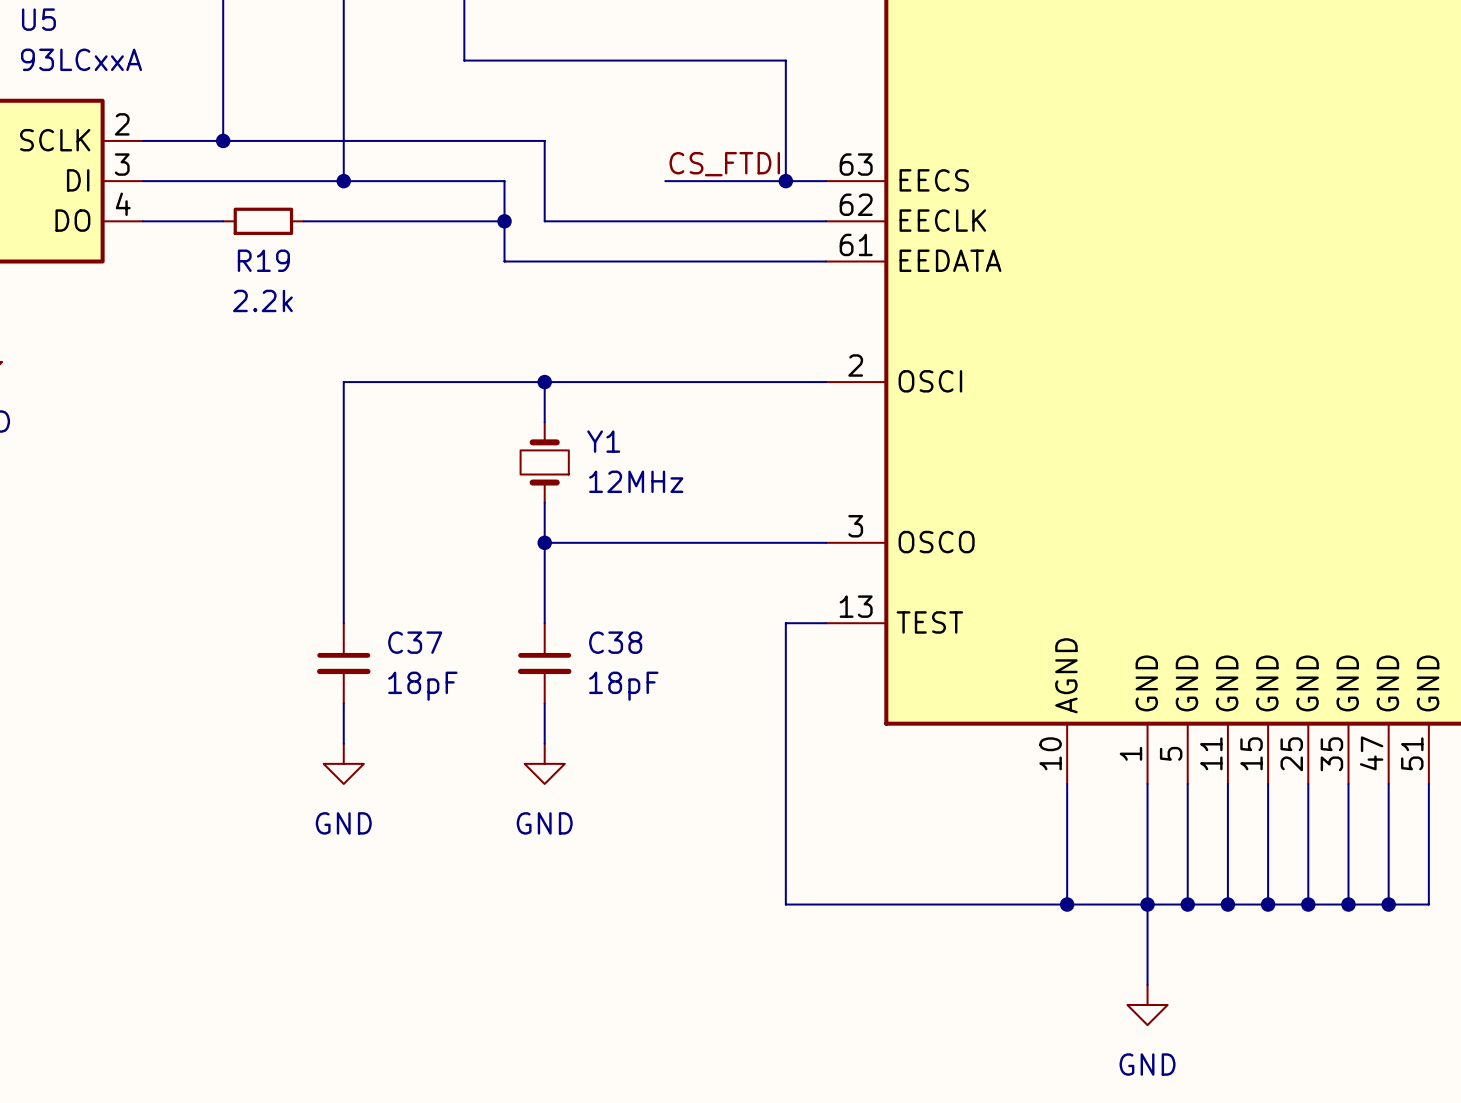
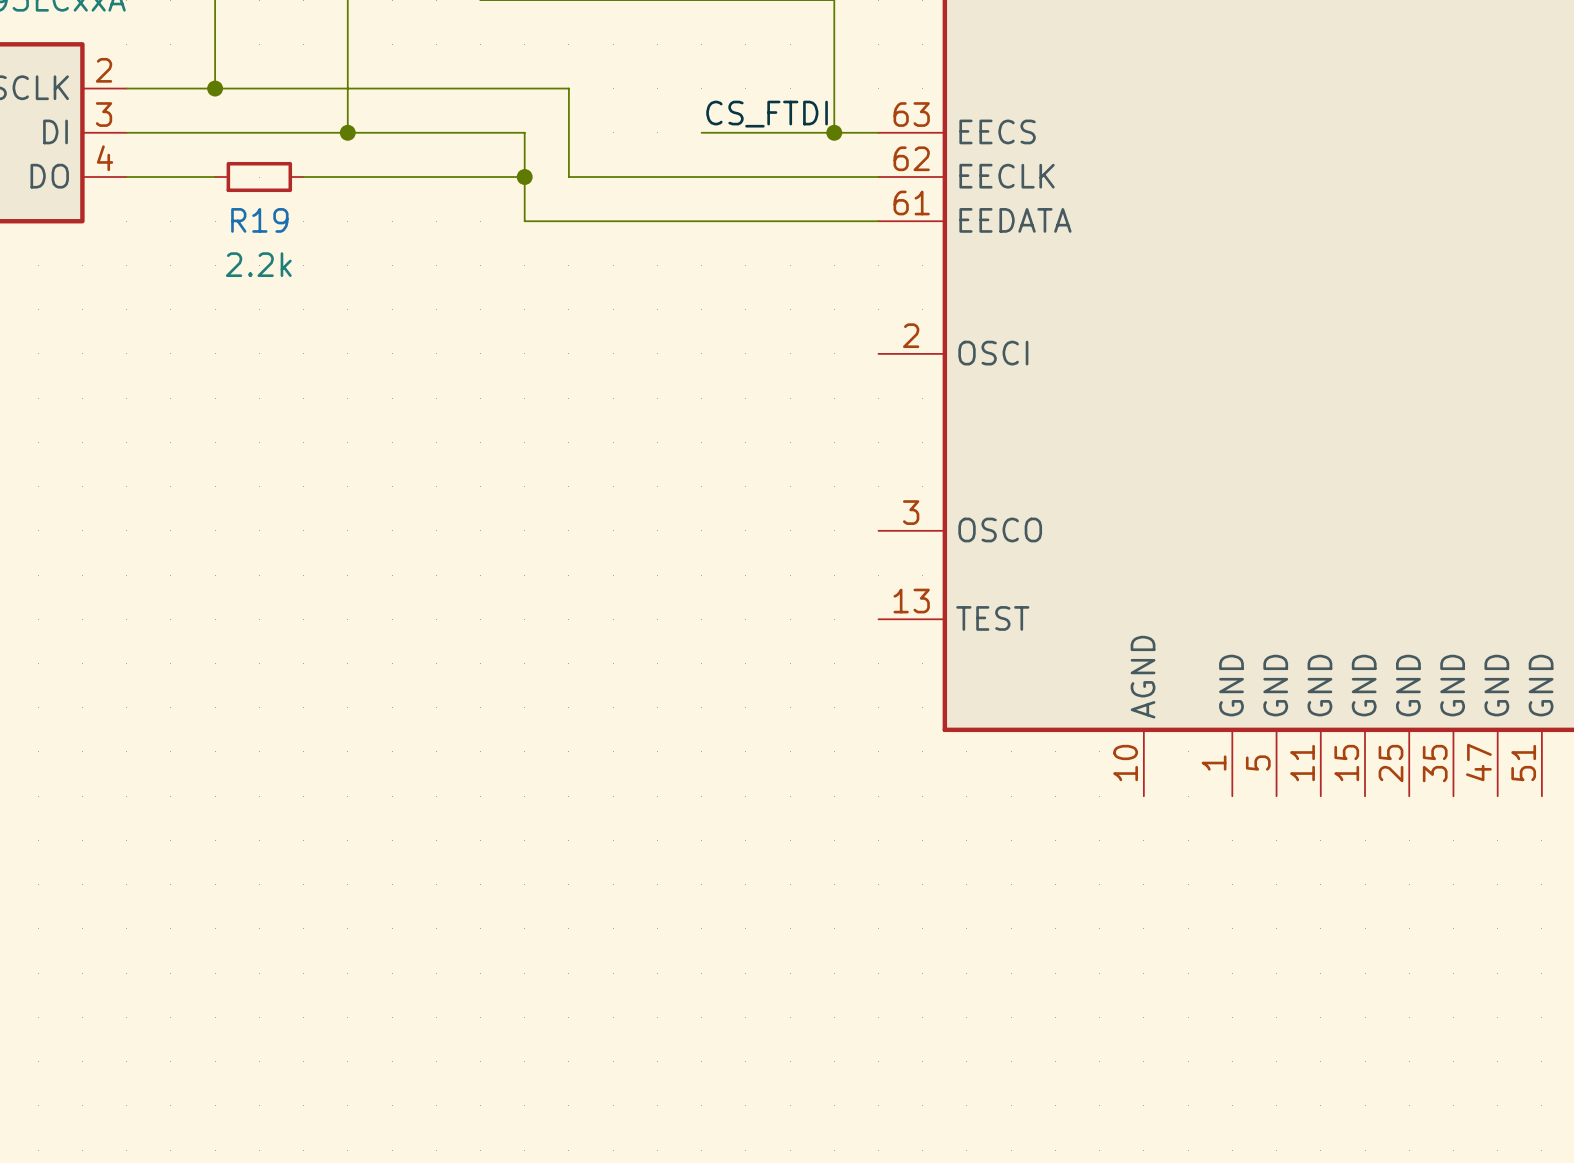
wire: (544, 382) (544, 422) -> none
junction: (544, 382) -> none
wire: (826, 382) (343, 382) (343, 623) -> none
Y1: 12MHz (544, 462) -> none
wire: (544, 502) (544, 623) -> none
wire: (544, 542) (826, 542) -> none
junction: (544, 542) -> none
wire: (826, 623) (785, 623) (785, 904) (1428, 904) (1428, 783) -> none
C37: 18pF (343, 663) -> none
C38: 18pF (544, 663) -> none
wire: (343, 703) (343, 743) -> none
wire: (544, 703) (544, 743) -> none
power symbol: GND (343, 763) -> none
power symbol: GND (544, 763) -> none
wire: (1067, 783) (1067, 904) -> none
wire: (1147, 783) (1147, 984) -> none
wire: (1187, 783) (1187, 904) -> none
wire: (1227, 783) (1227, 904) -> none
wire: (1268, 783) (1268, 904) -> none
wire: (1308, 783) (1308, 904) -> none
wire: (1348, 783) (1348, 904) -> none
wire: (1388, 783) (1388, 904) -> none
junction: (1067, 904) -> none
junction: (1147, 904) -> none
junction: (1187, 904) -> none
junction: (1227, 904) -> none
junction: (1268, 904) -> none
junction: (1308, 904) -> none
junction: (1348, 904) -> none
junction: (1388, 904) -> none
power symbol: GND (1147, 1005) -> none

